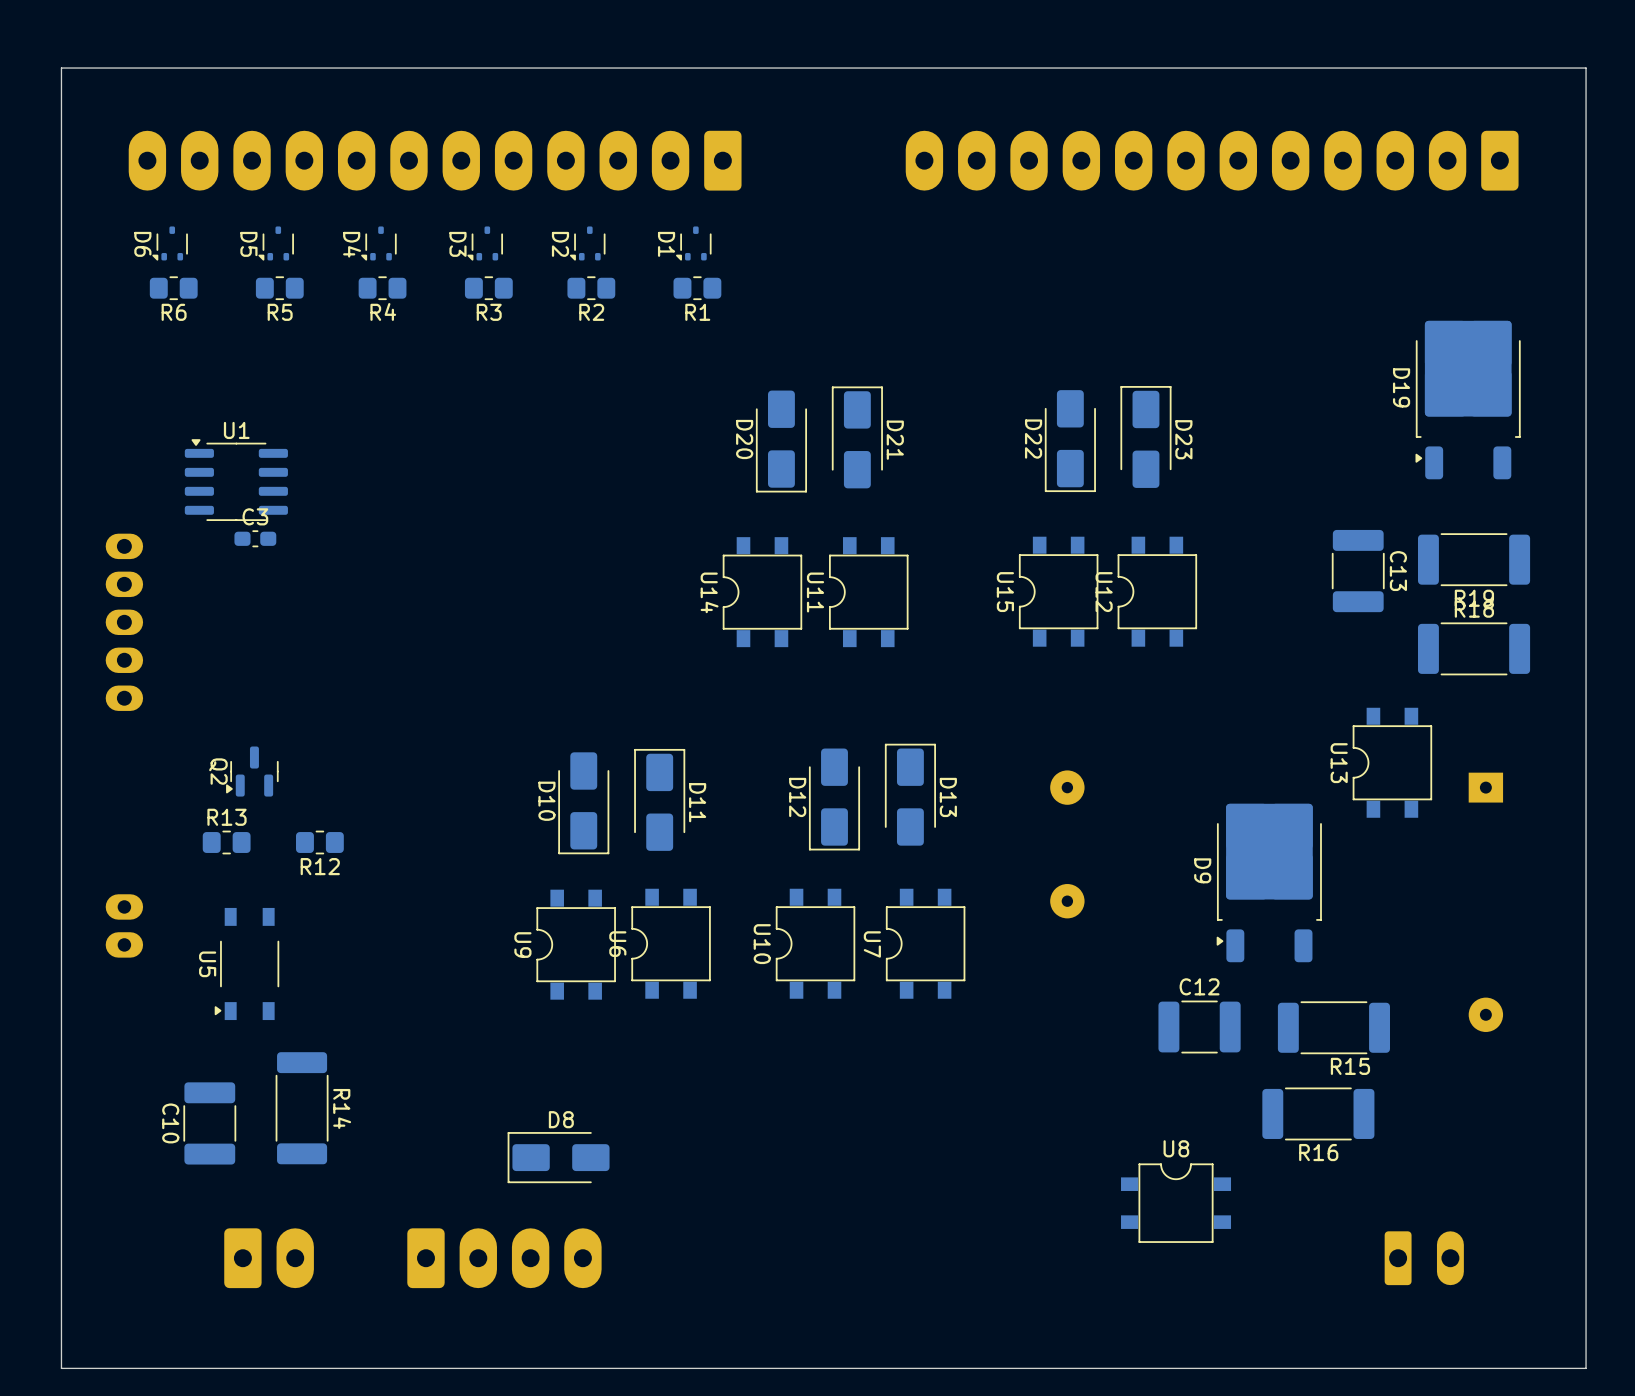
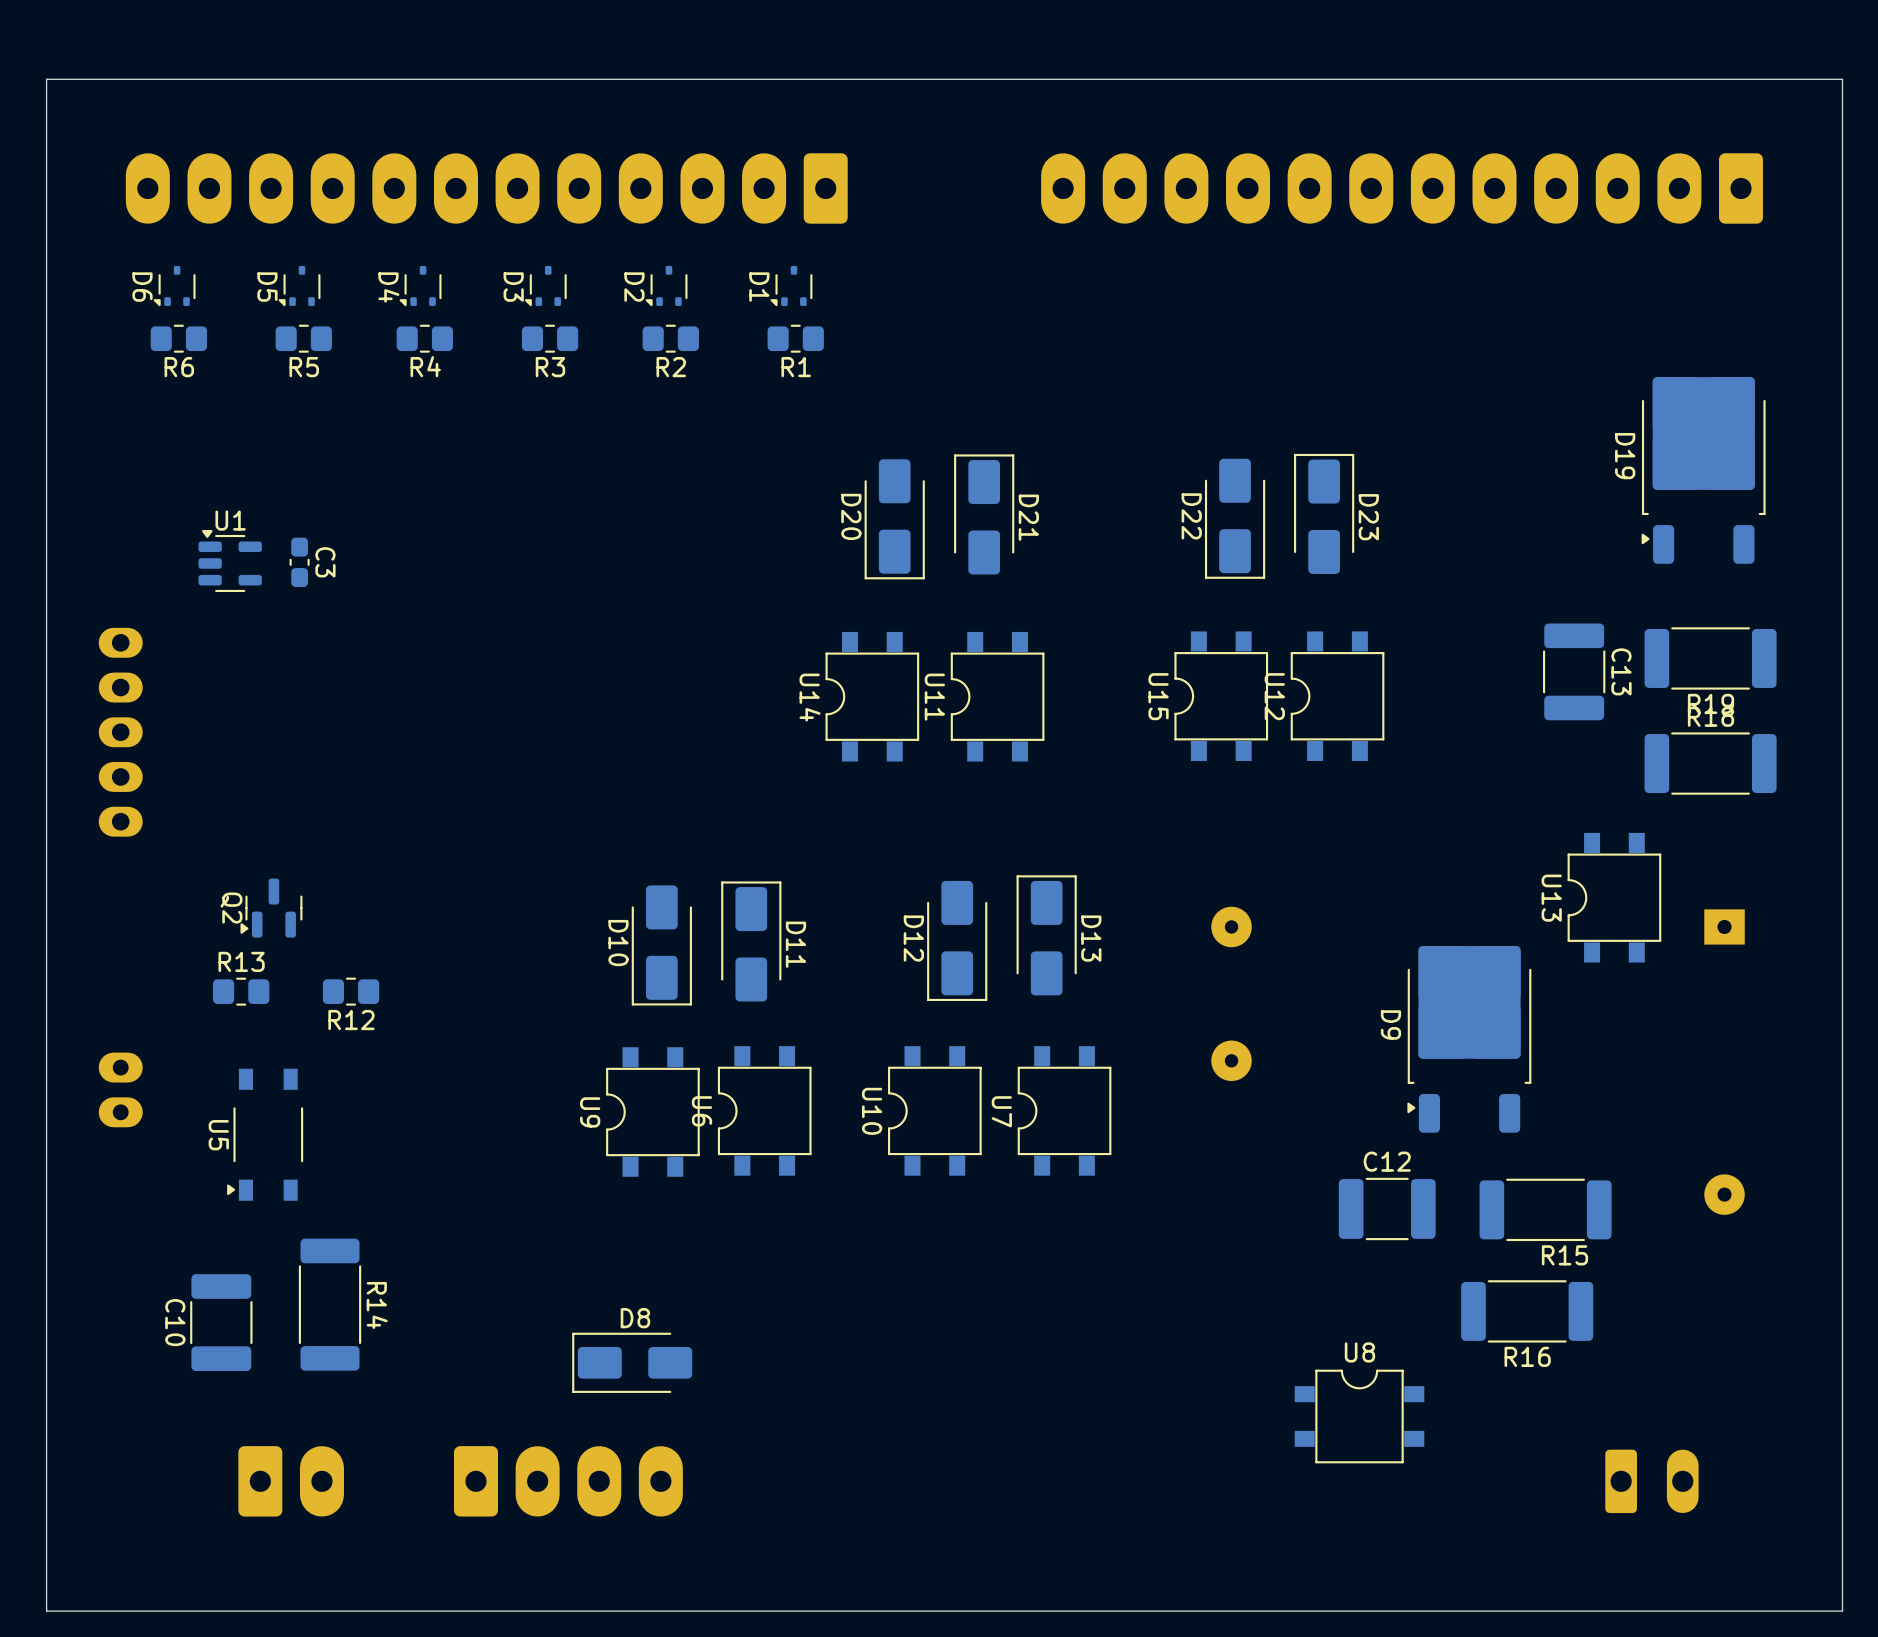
U1 footprint: [184, 439, 288, 521] -> [198, 530, 262, 593]
C3 rotation: 0° (255, 538) -> 90° clockwise (299, 562)
C3 position: (255, 538) -> (299, 562)

